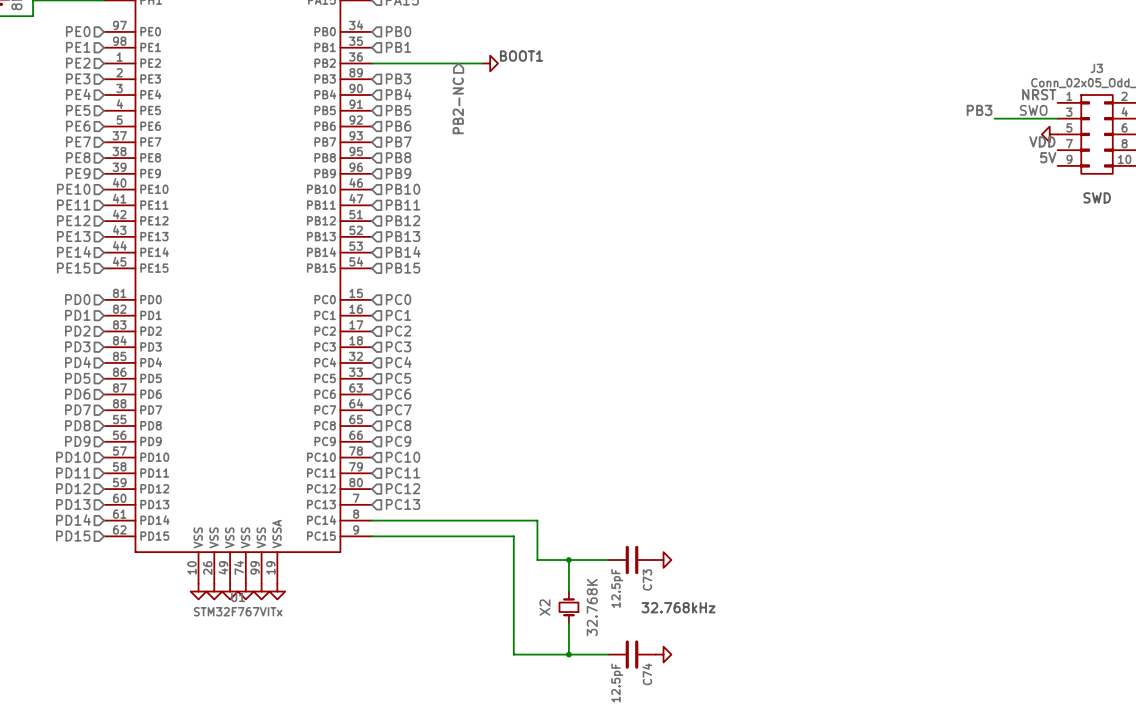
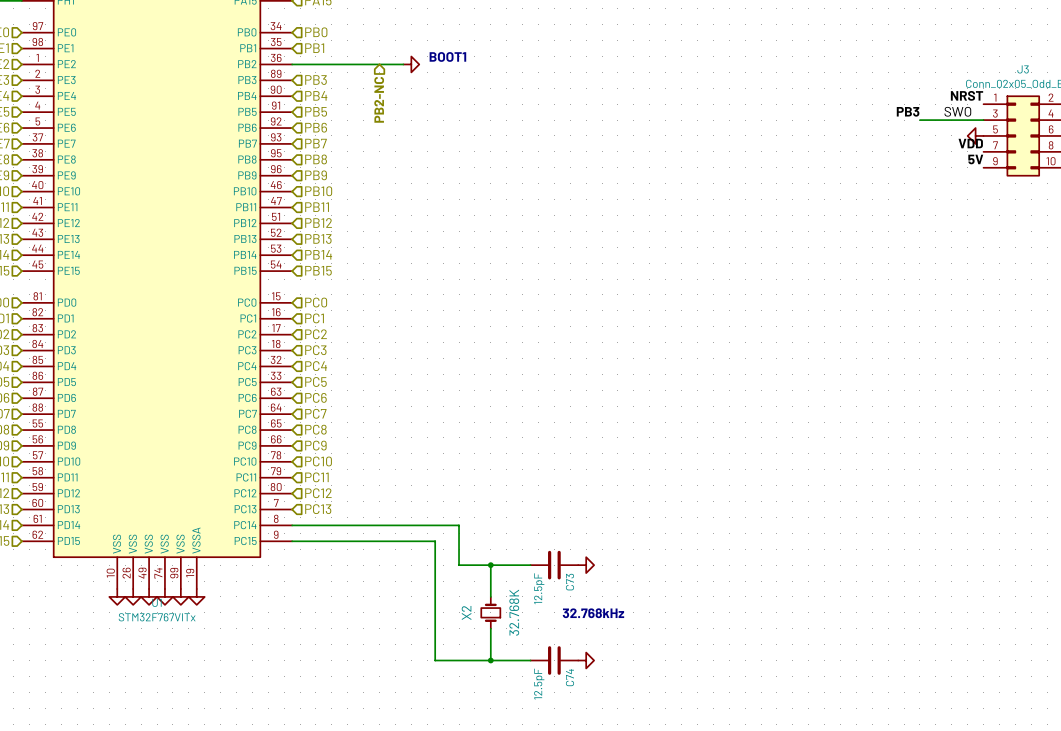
text: SWD (1097, 197) -> none

